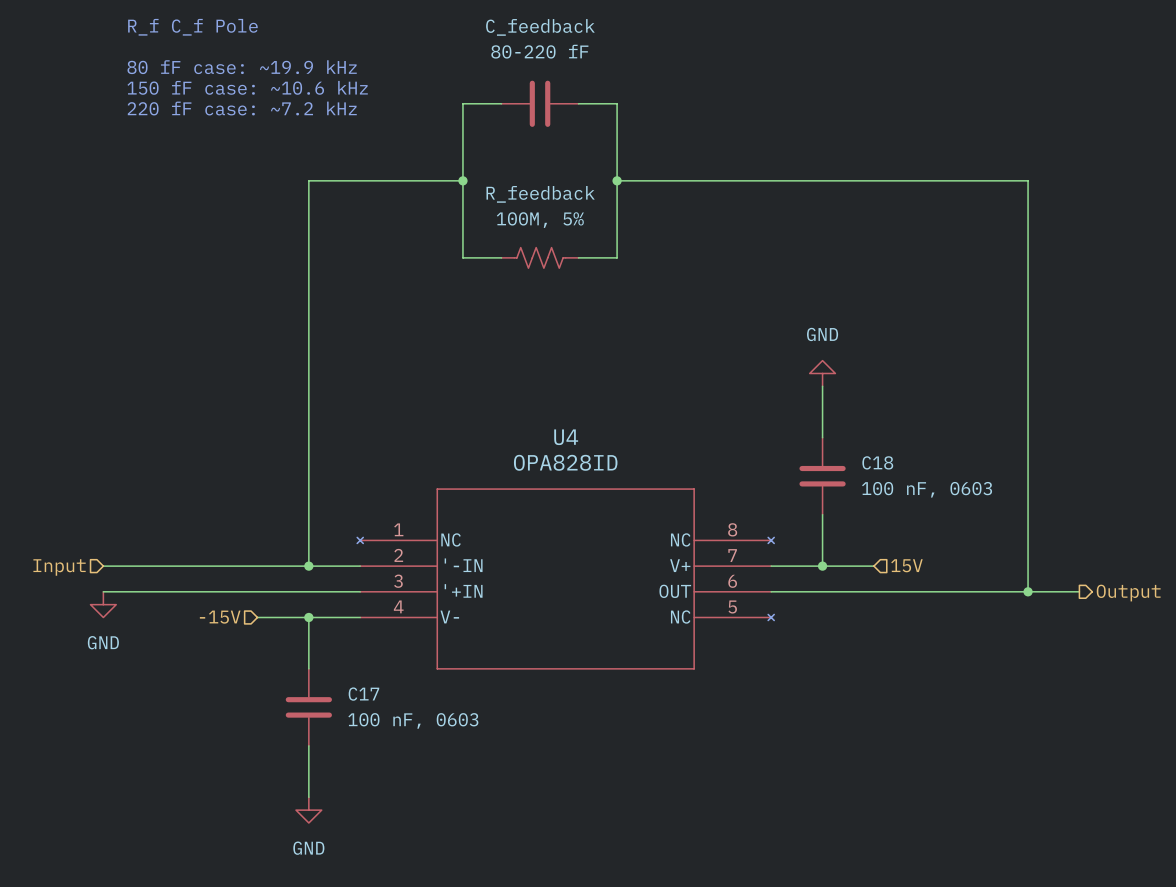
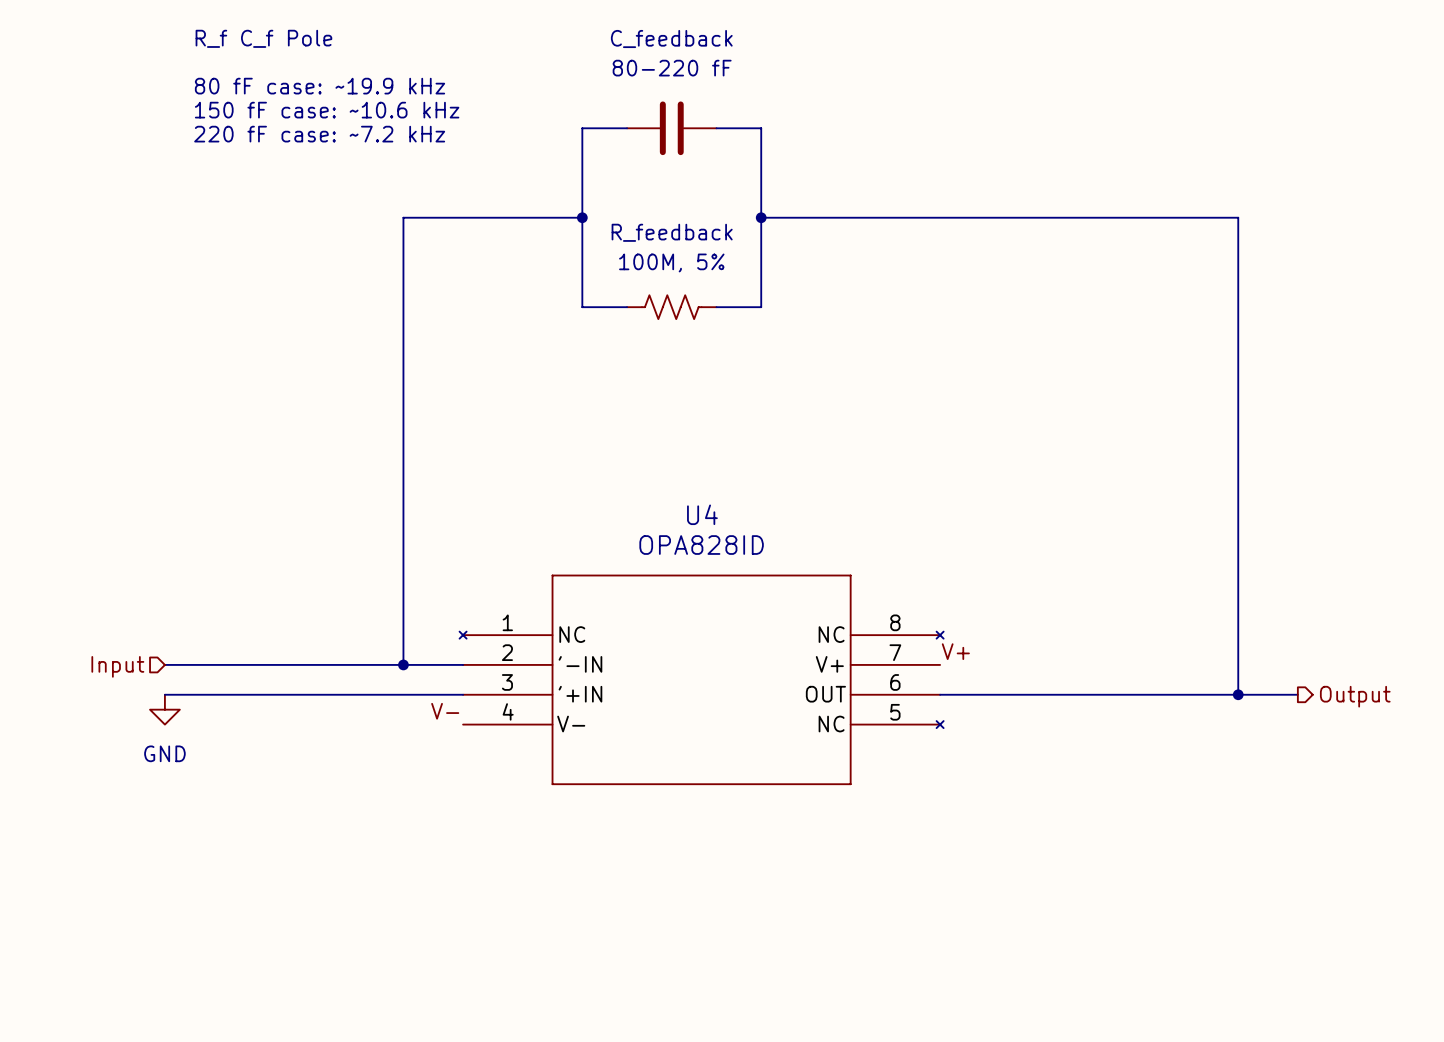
power symbol: GND (822, 373) -> none
wire: (822, 386) (822, 437) -> none
C18: 100 nF, 0603 (822, 476) -> none
wire: (822, 514) (822, 566) -> none
label: none -> V+ (955, 651)
hierarchical label: 15V (906, 565) -> none
wire: (771, 566) (873, 566) -> none
junction: (822, 566) -> none
label: none -> V- (445, 711)
hierarchical label: -15V (220, 617) -> none
wire: (257, 617) (360, 617) -> none
wire: (308, 617) (308, 668) -> none
junction: (308, 617) -> none
C17: 100 nF, 0603 (308, 707) -> none
wire: (308, 745) (308, 797) -> none
power symbol: GND (308, 810) -> none

